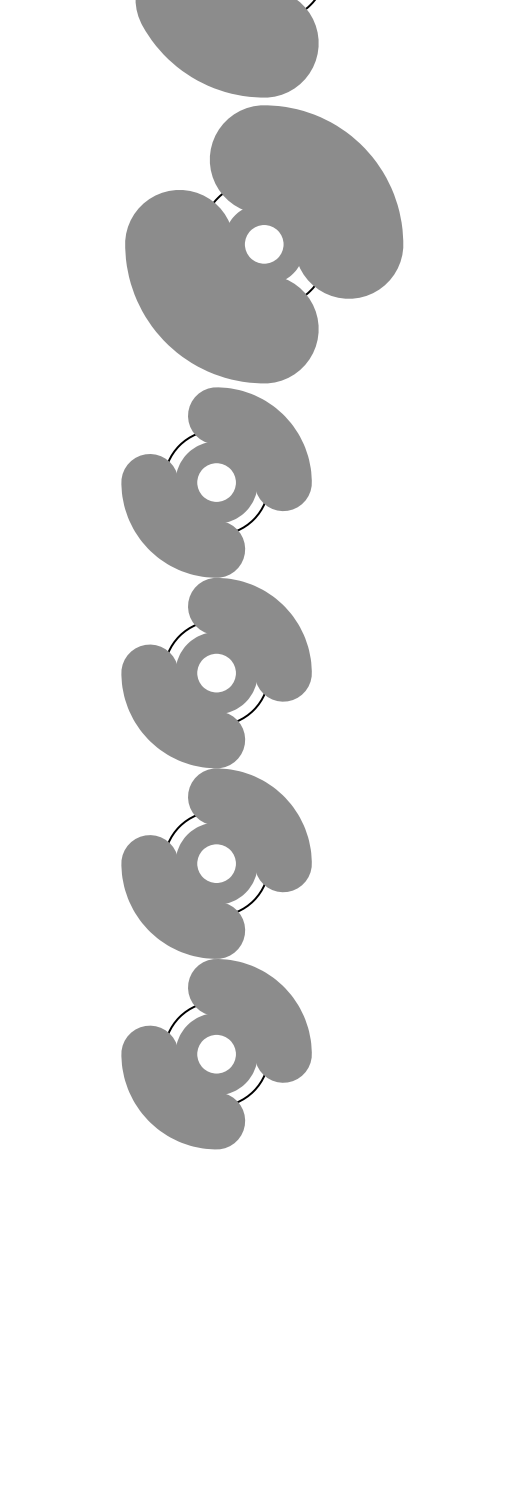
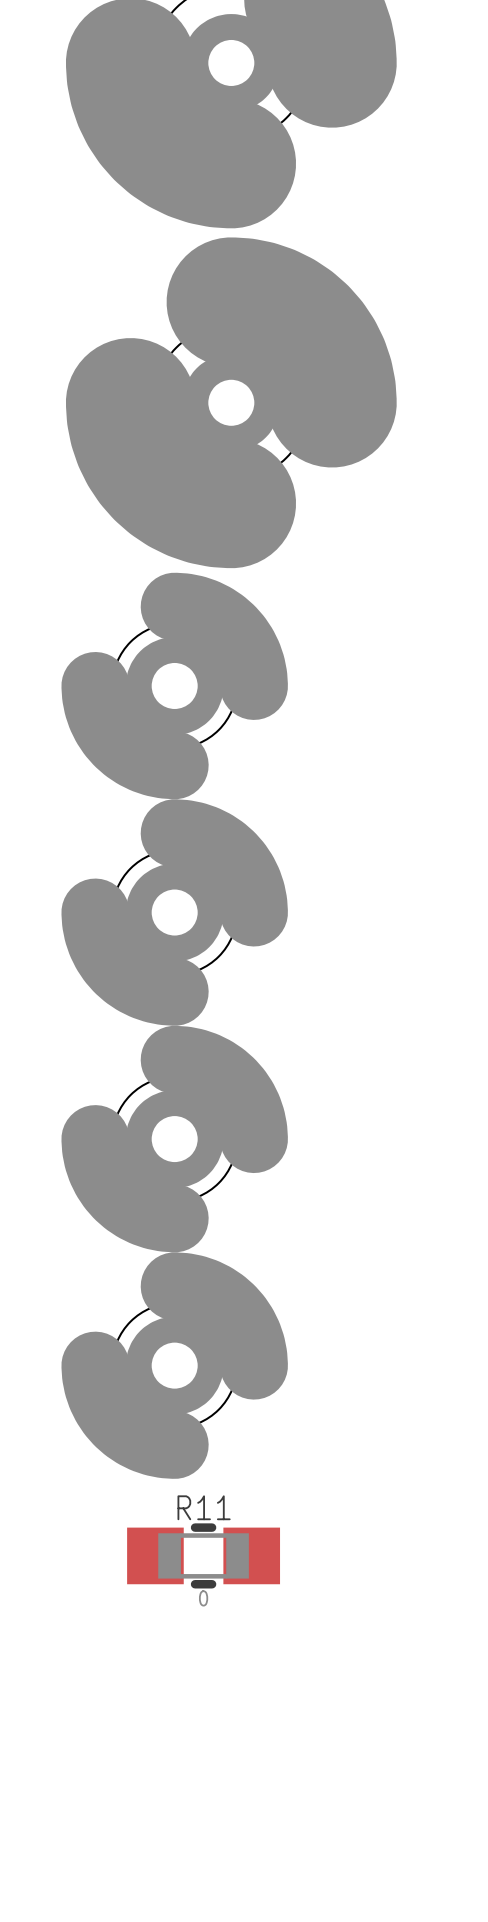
R11: none -> 0 (203, 1555)

